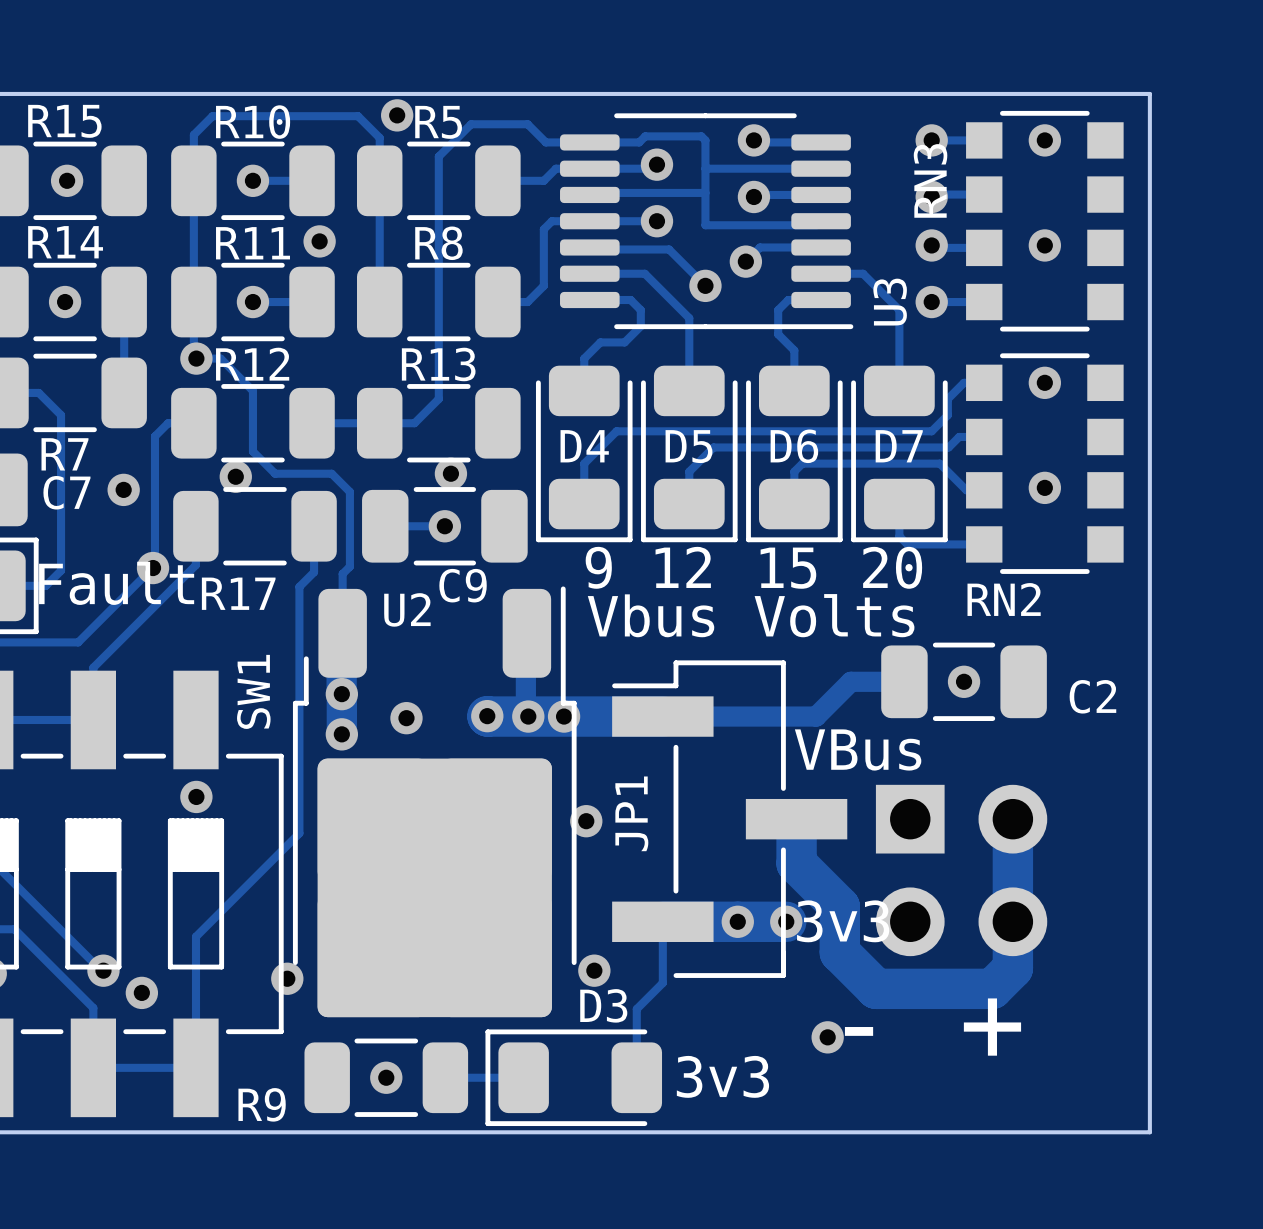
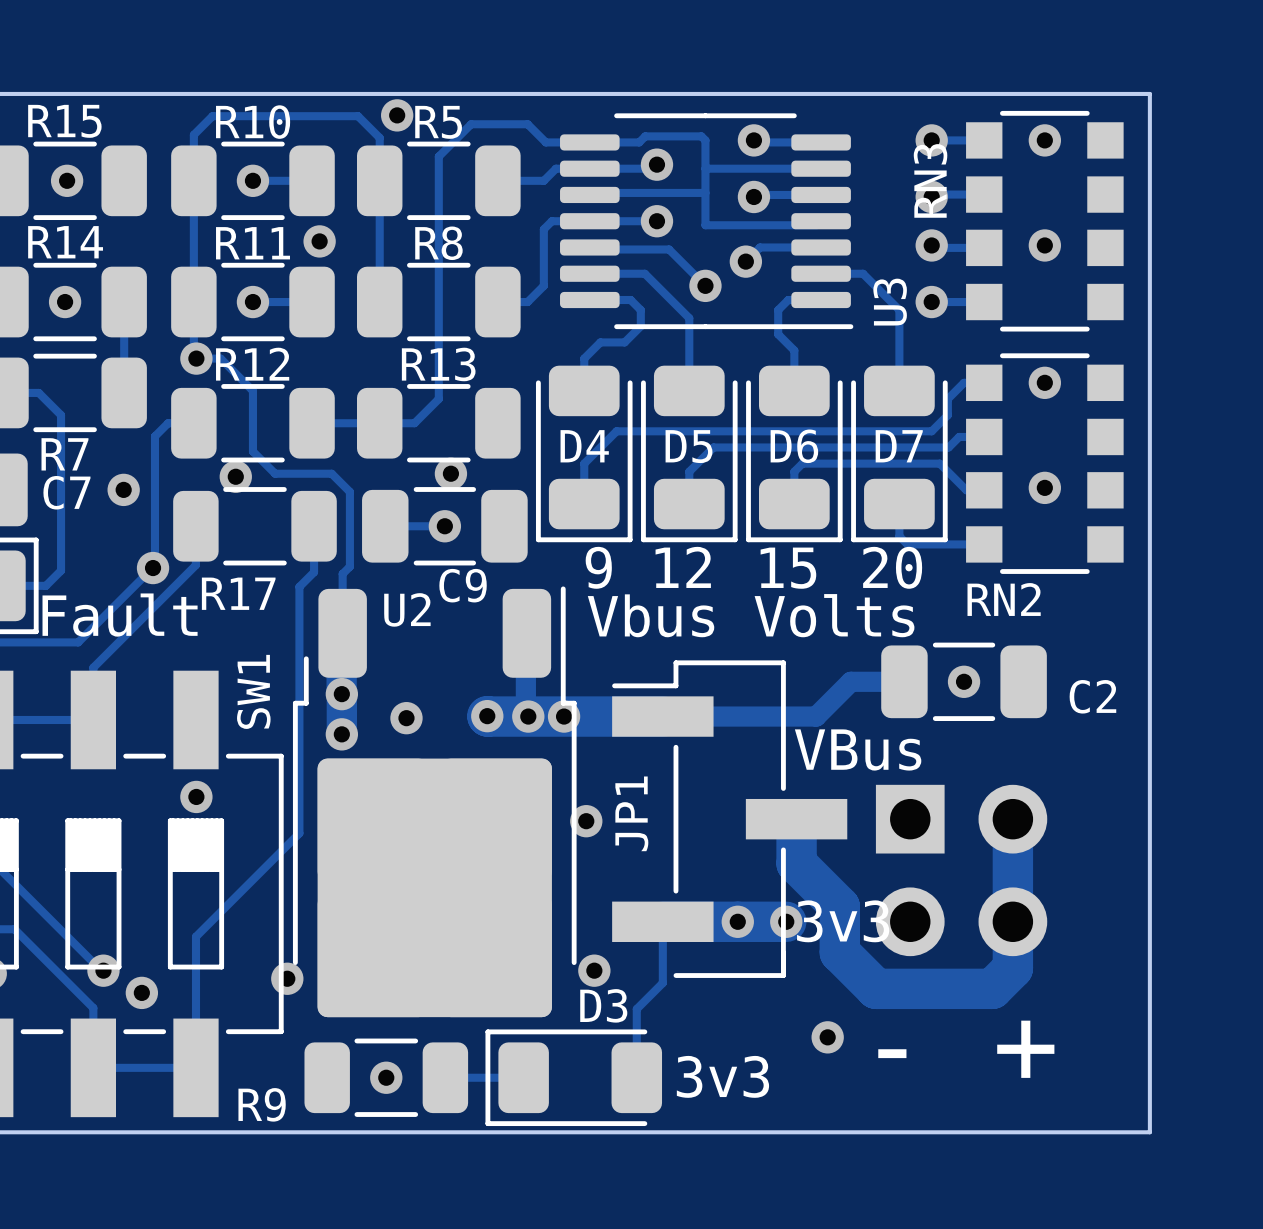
text position: Fault (116, 583) -> Fault (120, 615)
text position: - + (933, 1027) -> - + (966, 1049)

